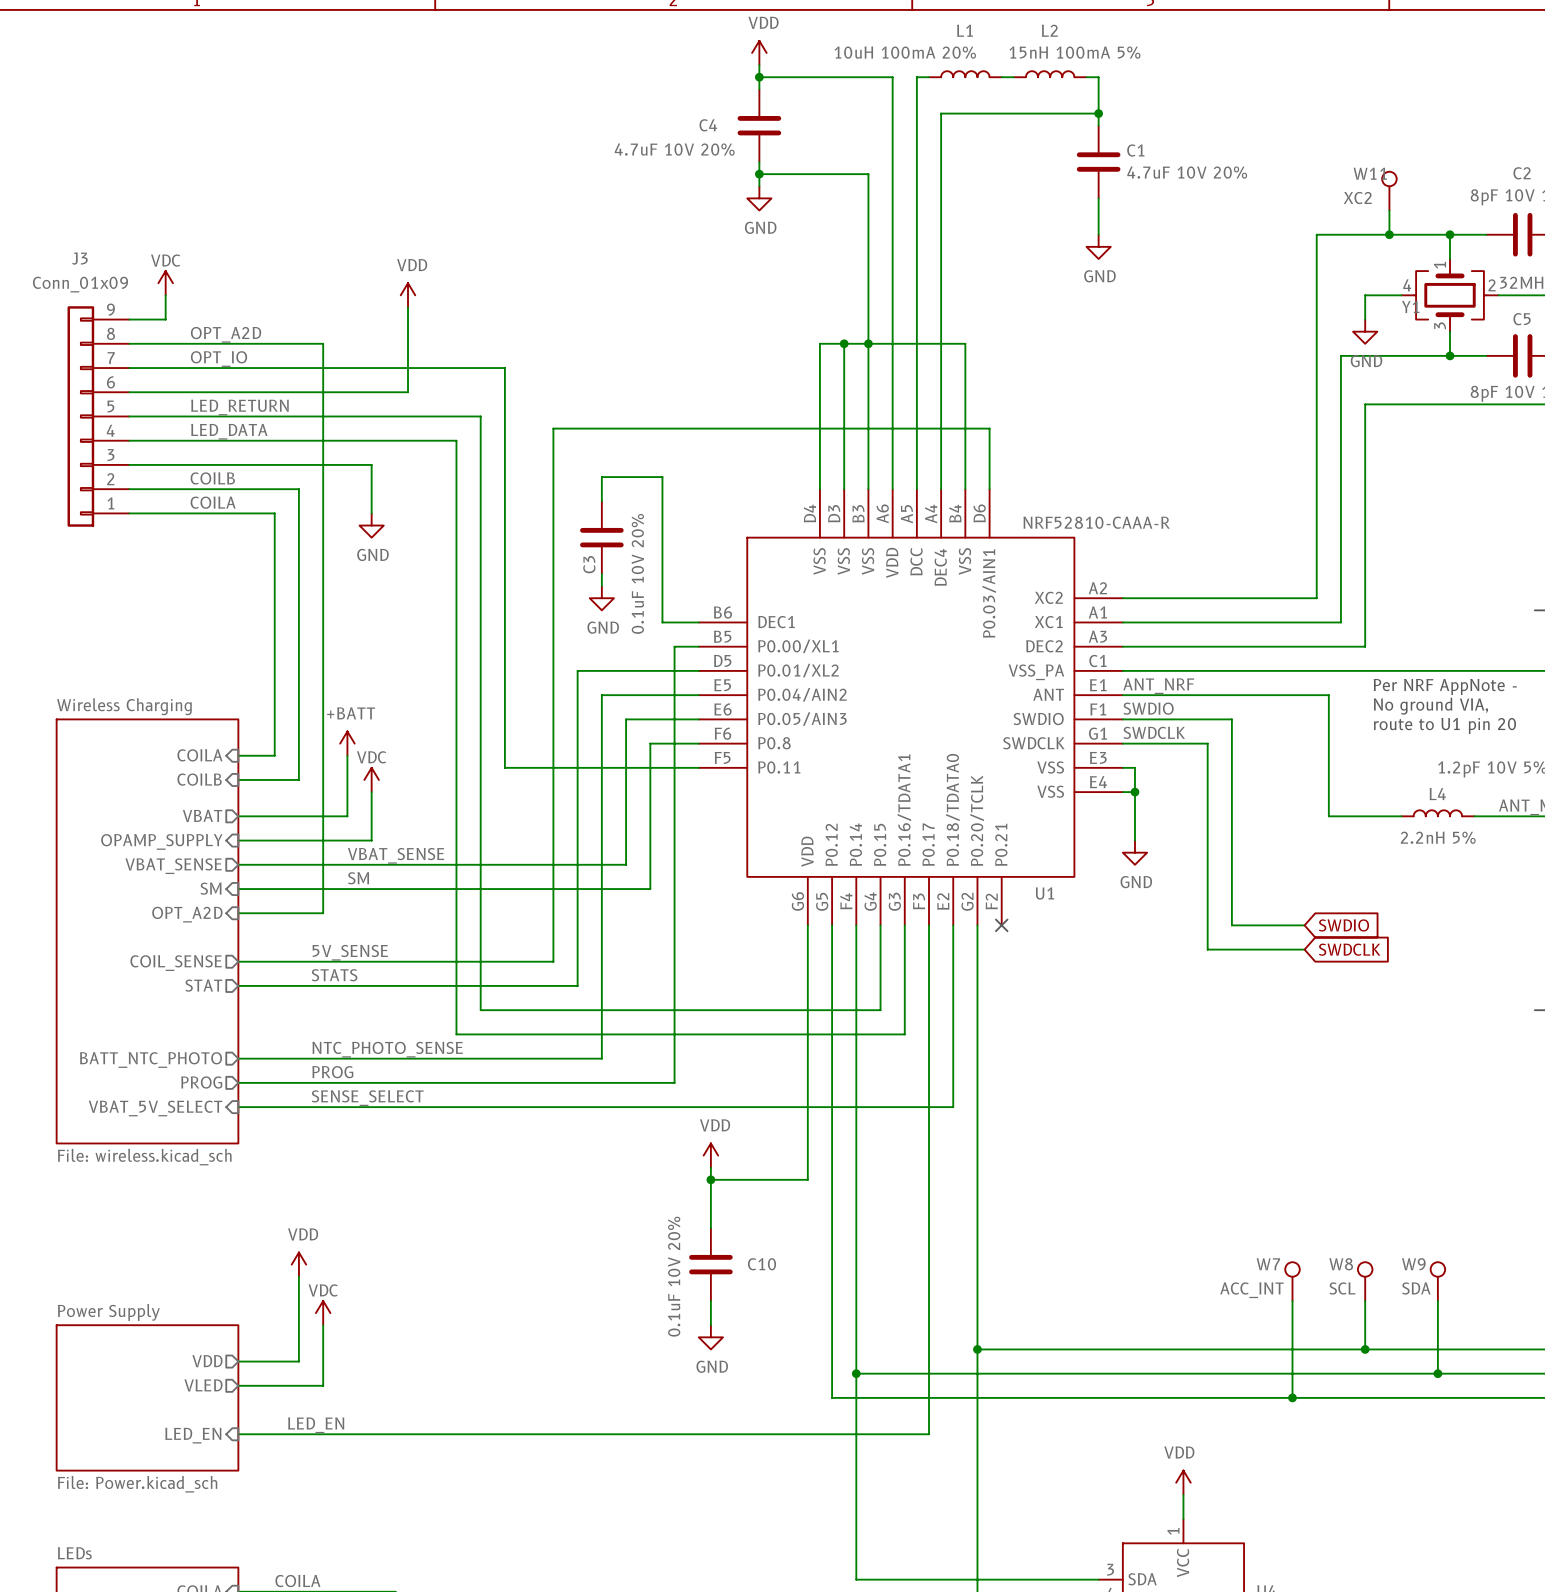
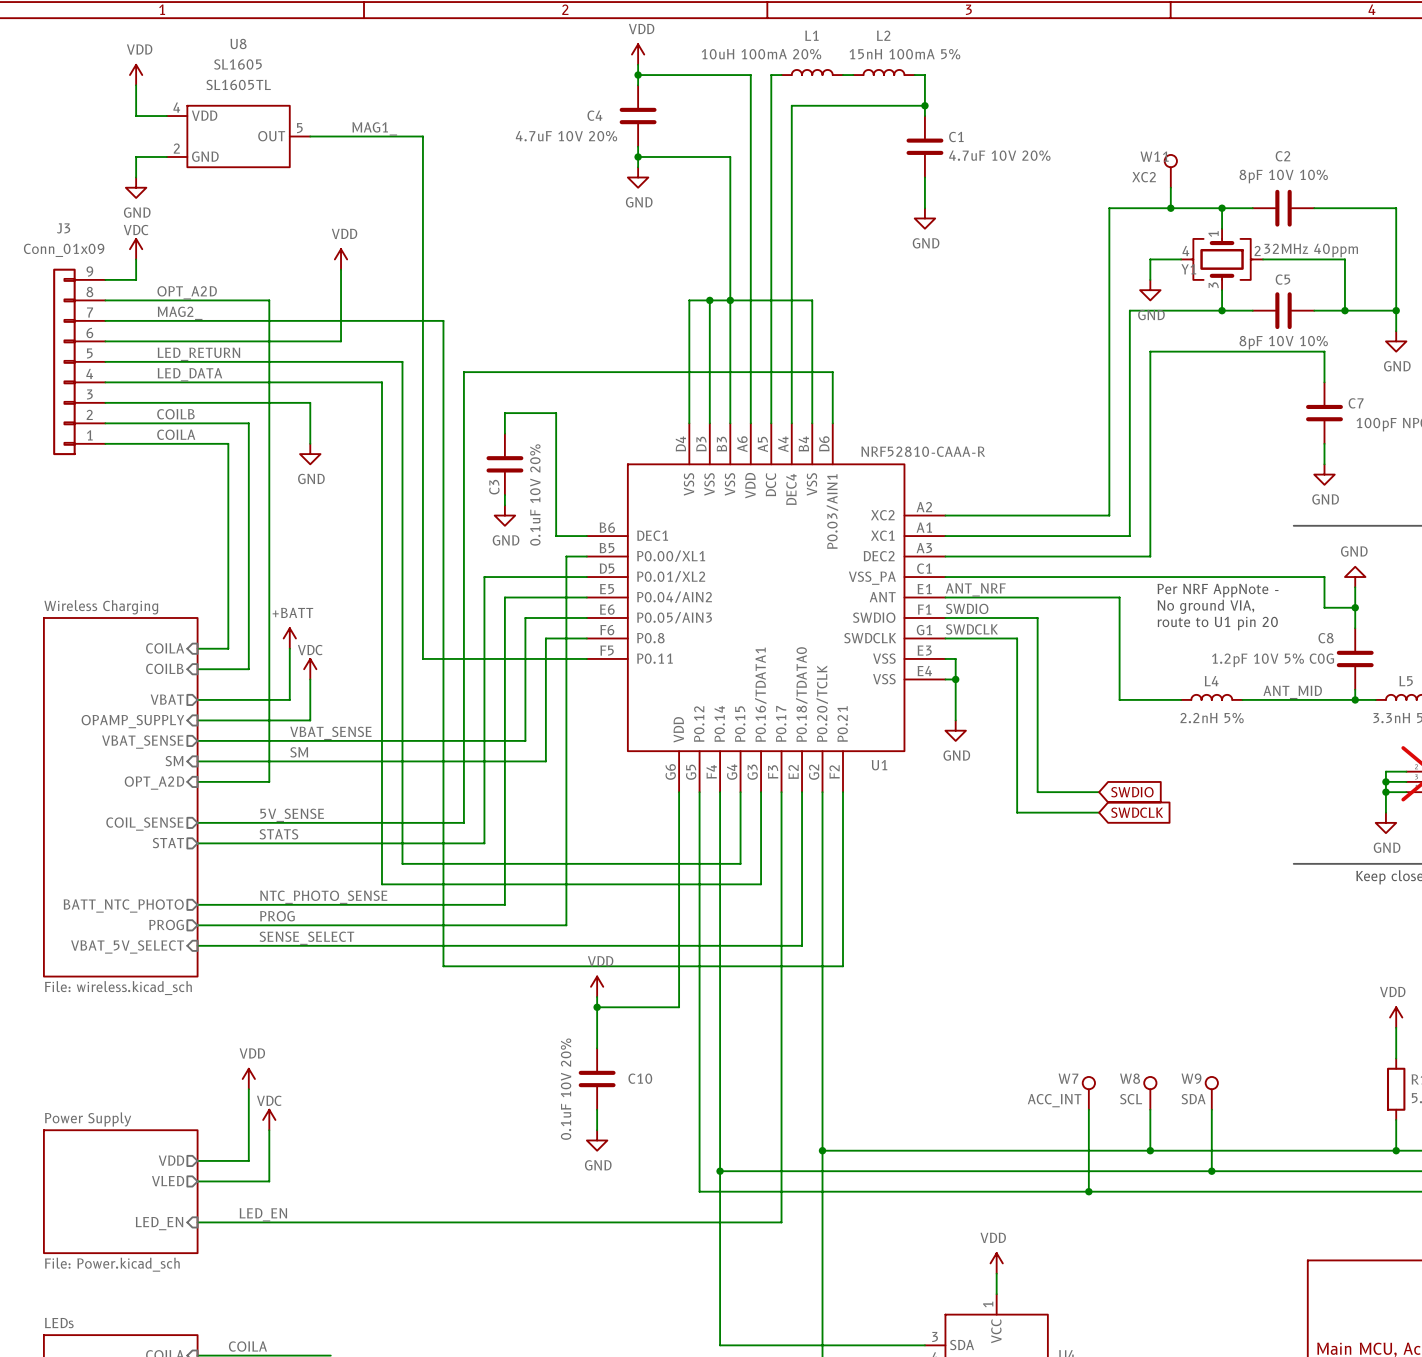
power symbol: none -> VDD (136, 75)
wire: none -> (136, 85) (136, 116) (166, 116)
label: none -> MAG1_ (374, 128)
U8: none -> SL1605 (238, 136)
wire: none -> (310, 136) (422, 136) (422, 320) (443, 320) (443, 966) (842, 966) (842, 792)
wire: none -> (166, 156) (136, 156) (136, 177)
power symbol: none -> GND (136, 187)
label: OPT_IO (219, 359) -> MAG2_ (180, 313)
no-connect mark: (1001, 925) -> none

